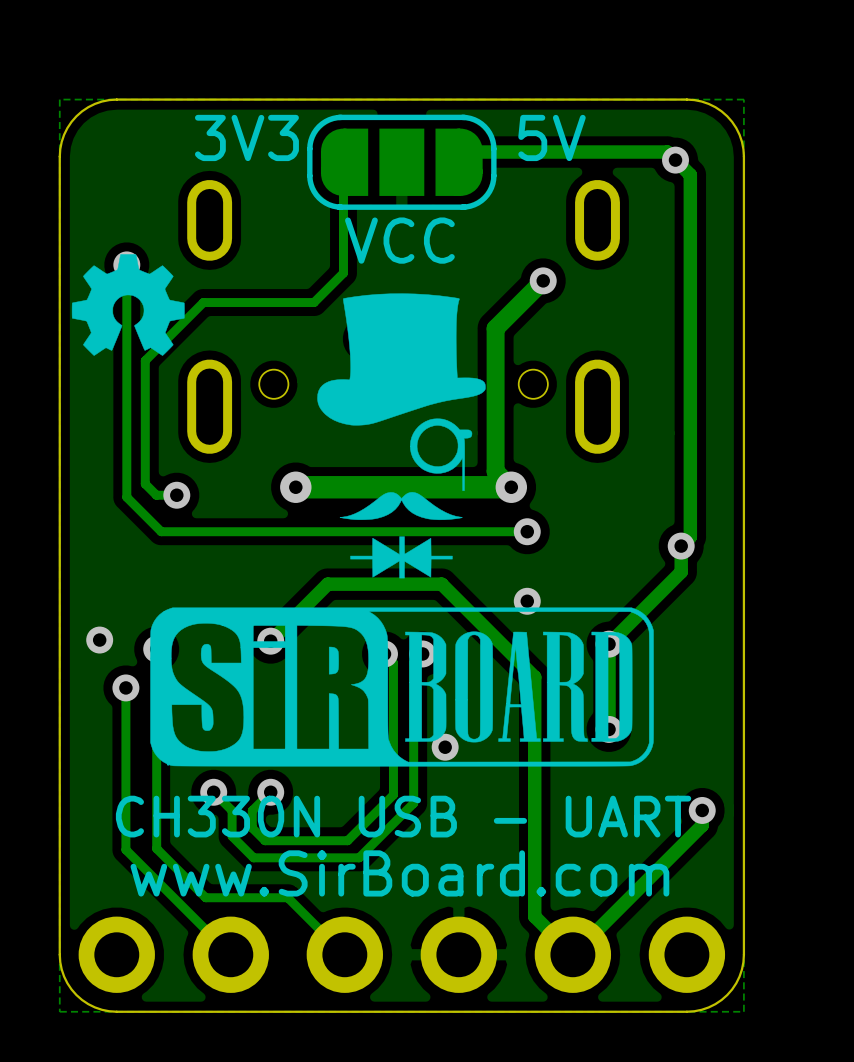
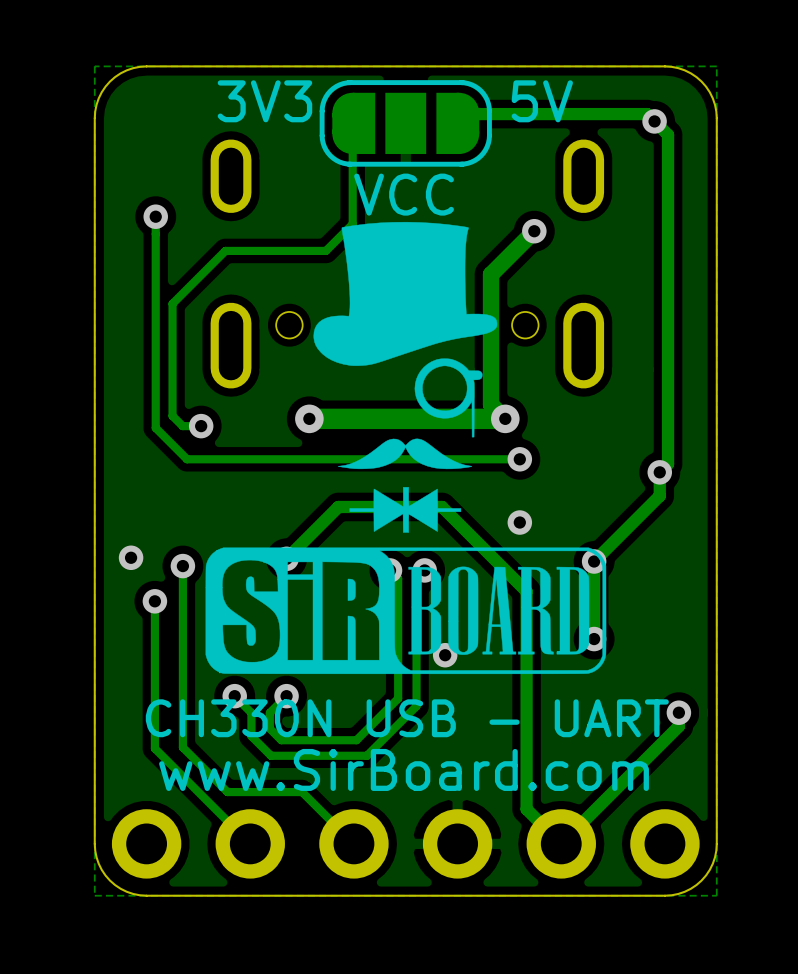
drawing: [71, 254, 185, 356] -> none
drawing shape: [317, 293, 486, 579] -> [313, 221, 498, 533]
drawing shape: [150, 607, 654, 767] -> [205, 547, 607, 675]

